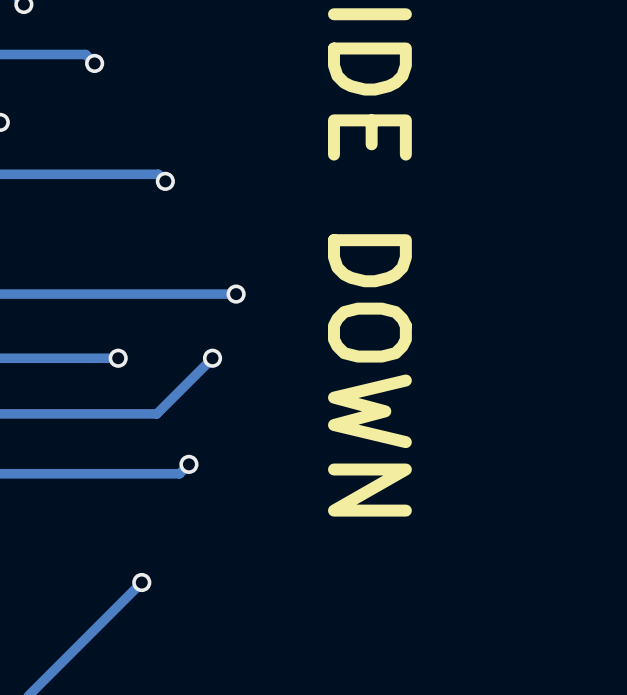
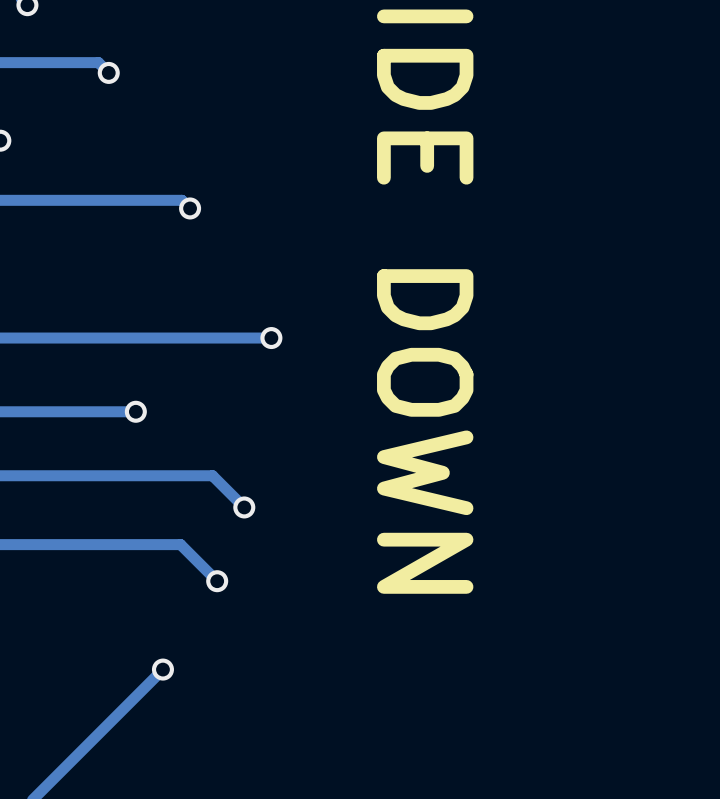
track: (212, 358) (156, 413) -> (244, 507) (212, 475) (180, 475)
via: (212, 358) -> none
via: none -> (244, 507)
track: (188, 464) (179, 473) (157, 473) -> (217, 581) (180, 544)
via: (188, 464) -> none
via: none -> (217, 581)

